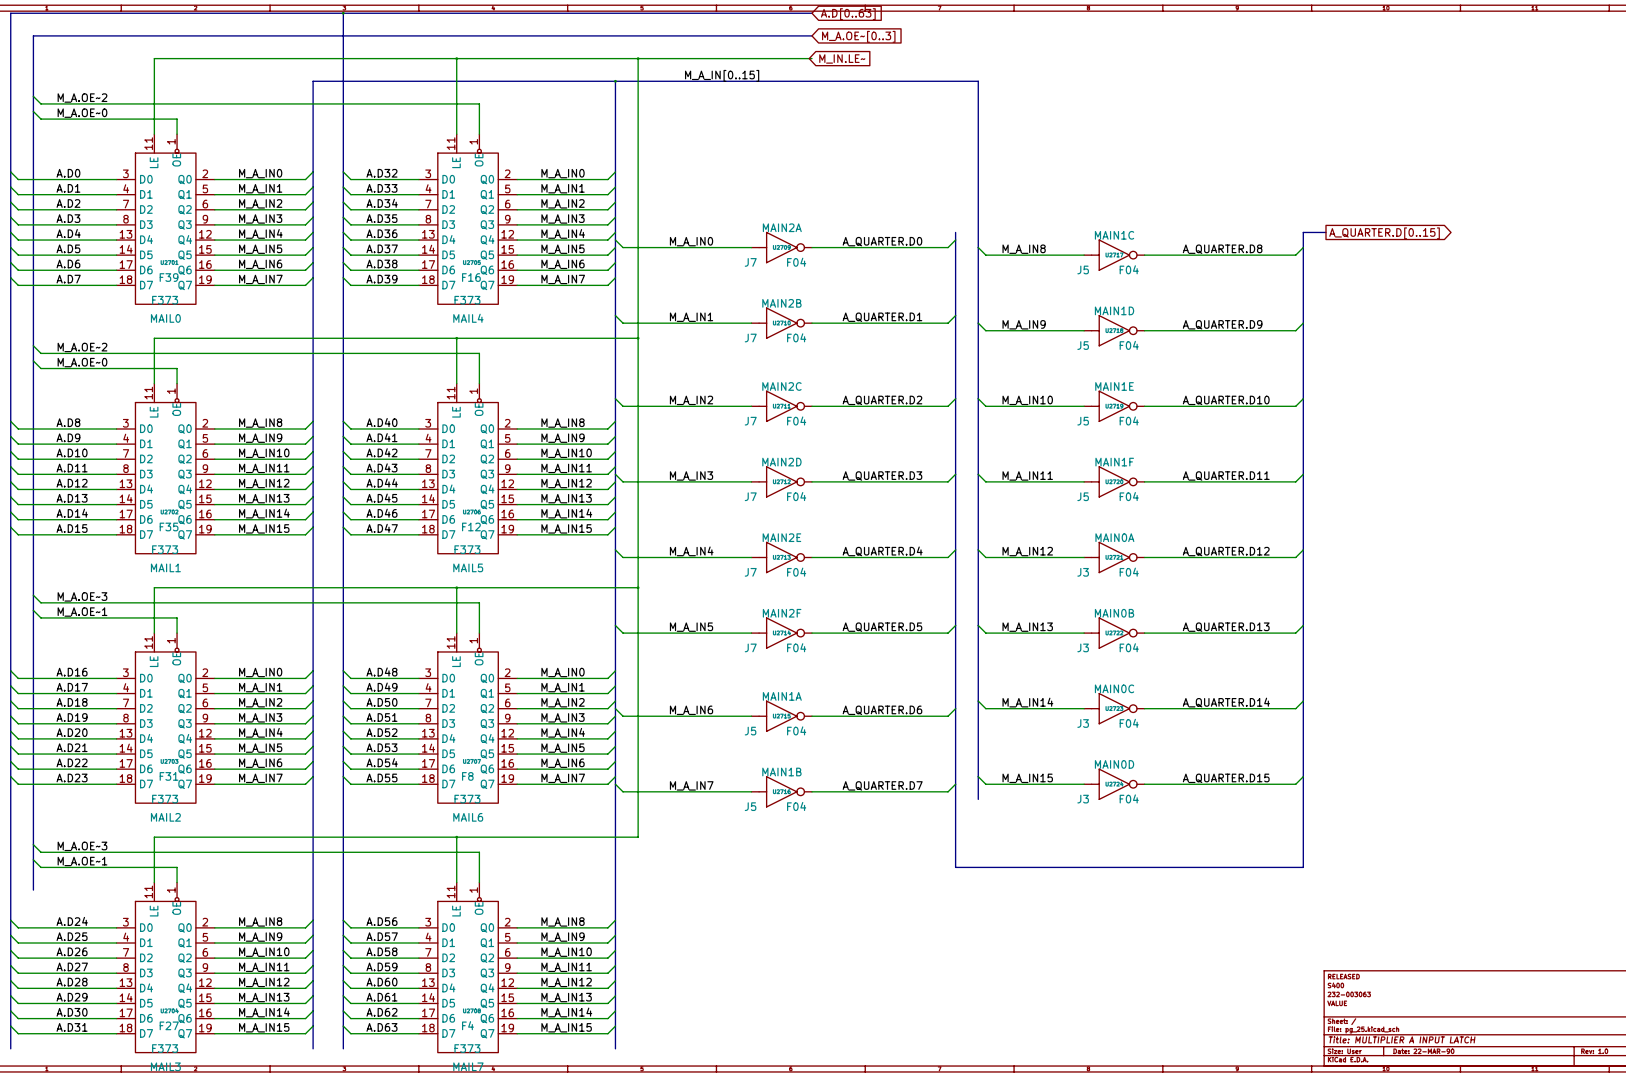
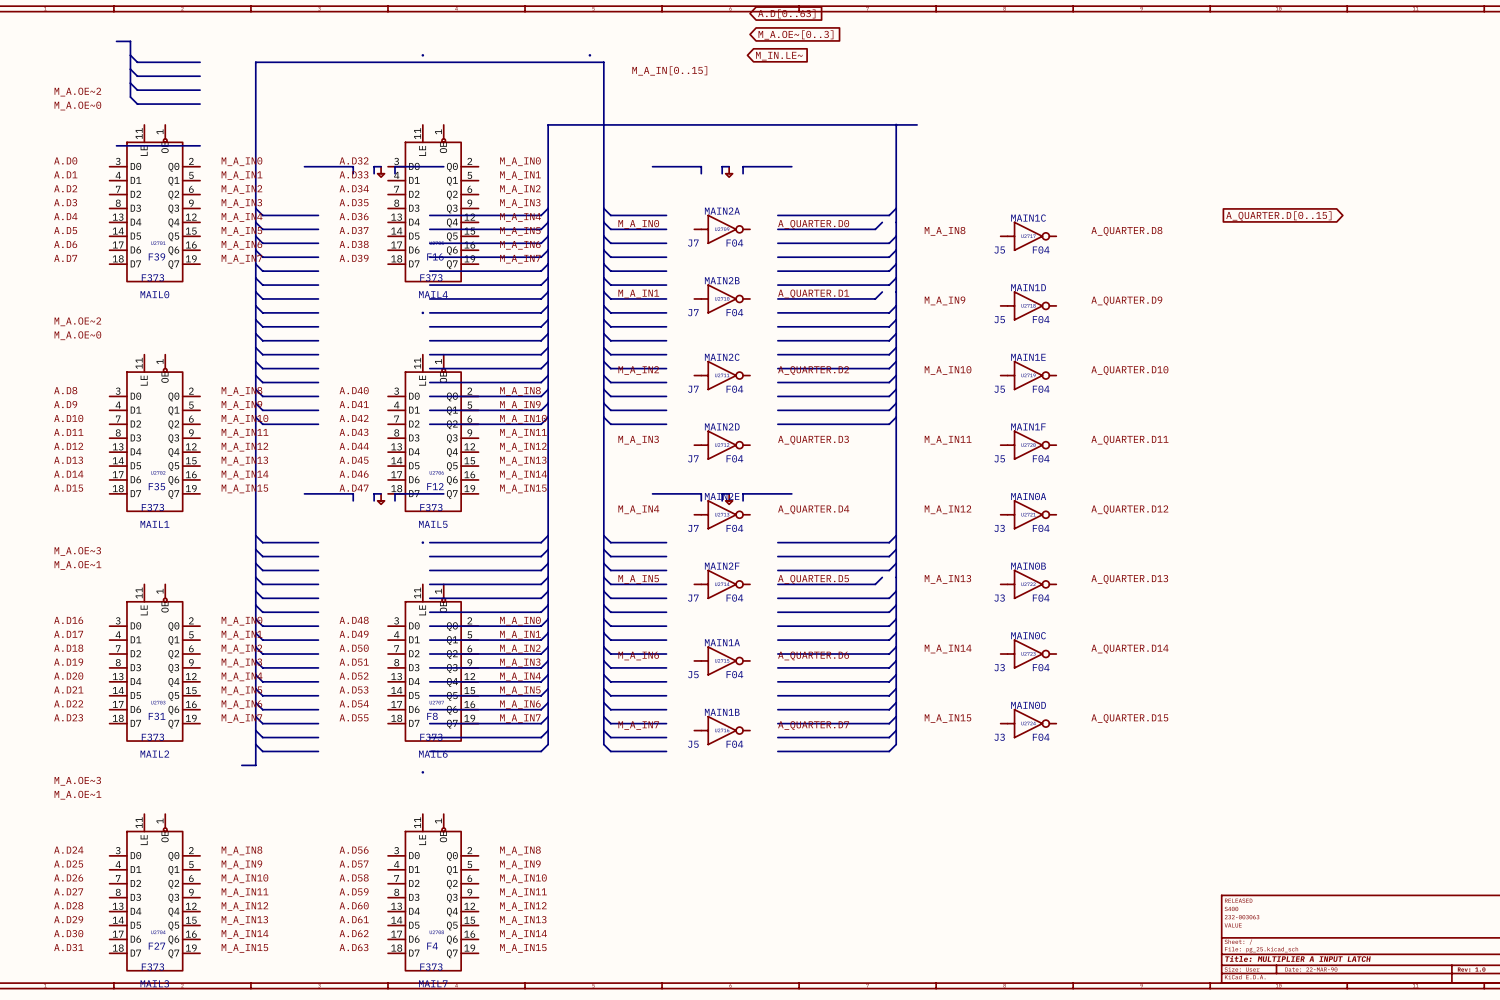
bus: (343, 13) (343, 1048) -> none
junction: (343, 13) -> none
bus: (811, 13) (10, 13) (10, 1048) -> none
bus: (811, 35) (33, 35) (33, 890) -> none
bus: none -> (116, 41) (130, 41) (130, 97)
wire: none -> (130, 55) (137, 62) (200, 62)
wire: (456, 58) (456, 134) -> none
wire: (638, 58) (638, 837) (154, 837) (154, 882) -> none
wire: (811, 58) (154, 58) (154, 134) -> none
wire: none -> (130, 69) (137, 76) (200, 76)
bus: (615, 81) (615, 1048) -> none
junction: (615, 81) -> none
wire: none -> (130, 83) (137, 90) (200, 90)
wire: (33, 96) (40, 103) (479, 103) (479, 134) -> none
wire: none -> (130, 97) (137, 104) (200, 104)
wire: (33, 111) (40, 119) (177, 119) (177, 134) -> none
bus: none -> (896, 124) (896, 744)
bus: none -> (917, 124) (548, 124) (548, 744)
wire: none -> (116, 145) (200, 145)
wire: (10, 171) (18, 179) (116, 179) -> none
wire: (313, 171) (305, 179) (214, 179) -> none
wire: (343, 171) (350, 179) -> (304, 166) (325, 166)
wire: (615, 171) (607, 179) (517, 179) -> none
wire: (381, 179) (403, 179) -> (353, 166) (353, 173)
wire: none -> (374, 166) (374, 173)
wire: (411, 179) (418, 179) -> none
wire: none -> (443, 166) (394, 166) (394, 173)
wire: none -> (652, 166) (701, 166) (701, 173)
wire: none -> (729, 166) (722, 166) (722, 173)
wire: none -> (791, 166) (743, 166) (743, 173)
power symbol: none -> (381, 172)
power symbol: none -> (729, 172)
wire: (10, 187) (18, 194) (116, 194) -> none
wire: (313, 187) (305, 194) (214, 194) -> none
wire: (343, 187) (350, 194) (418, 194) -> none
wire: (615, 187) (607, 194) (517, 194) -> none
wire: (10, 202) (18, 209) (116, 209) -> none
wire: (313, 202) (305, 209) (214, 209) -> none
wire: (343, 202) (350, 209) (418, 209) -> none
wire: (615, 202) (607, 209) (517, 209) -> none
wire: (10, 217) (18, 224) (116, 224) -> none
wire: (313, 217) (305, 224) (214, 224) -> none
wire: (343, 217) (350, 224) (418, 224) -> none
wire: (615, 217) (607, 224) (517, 224) -> none
wire: none -> (548, 208) (541, 215) (429, 215)
wire: none -> (603, 208) (610, 215) (666, 215)
wire: none -> (896, 208) (889, 215) (777, 215)
wire: (10, 232) (18, 240) (116, 240) -> none
wire: (313, 232) (305, 240) (214, 240) -> none
wire: (343, 232) (350, 240) (418, 240) -> (318, 215) (262, 215) (255, 208)
wire: (615, 232) (607, 240) (517, 240) -> none
bus: (955, 232) (955, 867) (1303, 867) (1303, 232) (1325, 232) -> none
wire: none -> (548, 222) (541, 229) (429, 229)
wire: (615, 240) (623, 247) (660, 247) -> (603, 222) (610, 229)
wire: (10, 247) (18, 255) (116, 255) -> none
wire: (313, 247) (305, 255) (214, 255) -> none
wire: (343, 247) (350, 255) (418, 255) -> (318, 229) (262, 229) (255, 222)
wire: (615, 247) (607, 255) (517, 255) -> none
wire: (721, 247) (751, 247) -> none
wire: (811, 247) (842, 247) -> none
wire: (978, 247) (985, 255) (1084, 255) -> none
wire: (1303, 247) (1295, 255) (1144, 255) -> none
wire: none -> (548, 236) (541, 243) (429, 243)
wire: none -> (603, 236) (610, 243) (666, 243)
wire: none -> (896, 236) (889, 243) (777, 243)
wire: (10, 262) (18, 270) (116, 270) -> none
wire: (313, 262) (305, 270) (214, 270) -> none
wire: (343, 262) (350, 270) (418, 270) -> (318, 243) (262, 243) (255, 236)
wire: (615, 262) (607, 270) (517, 270) -> none
wire: none -> (548, 250) (541, 257) (429, 257)
wire: none -> (603, 250) (610, 257) (666, 257)
wire: none -> (896, 250) (889, 257) (777, 257)
wire: (10, 277) (18, 285) (116, 285) -> none
wire: (313, 277) (305, 285) (214, 285) -> none
wire: (343, 277) (350, 285) (418, 285) -> (318, 257) (262, 257) (255, 250)
wire: (615, 277) (607, 285) (517, 285) -> none
wire: none -> (255, 264) (262, 271) (318, 271)
wire: none -> (548, 264) (541, 271) (429, 271)
wire: none -> (603, 264) (610, 271) (666, 271)
wire: none -> (896, 264) (889, 271) (777, 271)
wire: none -> (255, 278) (262, 285) (318, 285)
wire: none -> (548, 278) (541, 285) (429, 285)
wire: none -> (603, 278) (610, 285) (666, 285)
wire: none -> (896, 278) (889, 285) (777, 285)
wire: none -> (255, 292) (262, 298) (318, 298)
wire: none -> (548, 292) (541, 298) (429, 298)
wire: (615, 315) (623, 323) (660, 323) -> (603, 292) (610, 298)
wire: (721, 323) (751, 323) -> none
wire: (811, 323) (842, 323) -> none
wire: (978, 323) (985, 330) (1084, 330) -> none
wire: (1303, 323) (1295, 330) (1144, 330) -> none
wire: none -> (603, 305) (610, 312) (666, 312)
wire: none -> (896, 305) (889, 312) (777, 312)
wire: (282, 338) (154, 338) (154, 383) -> (262, 312) (255, 305)
wire: (343, 338) (464, 338) -> none
wire: (456, 338) (456, 383) -> none
wire: (585, 338) (638, 338) -> (541, 312) (548, 305)
wire: (33, 345) (40, 353) (282, 353) -> (255, 319) (262, 326)
wire: none -> (603, 319) (610, 326) (666, 326)
wire: none -> (896, 319) (889, 326) (777, 326)
wire: (343, 353) (464, 353) -> none
wire: (479, 353) (479, 383) -> (443, 326) (541, 326) (548, 319)
wire: (33, 360) (40, 368) (177, 368) (177, 383) -> none
wire: none -> (255, 333) (262, 340) (318, 340)
wire: none -> (548, 333) (541, 340) (429, 340)
wire: none -> (603, 333) (610, 340) (666, 340)
wire: none -> (896, 333) (889, 340) (777, 340)
wire: none -> (255, 347) (262, 354) (318, 354)
wire: none -> (548, 347) (541, 354) (429, 354)
wire: none -> (603, 347) (610, 354) (666, 354)
wire: none -> (896, 347) (889, 354) (777, 354)
wire: none -> (255, 361) (262, 368) (318, 368)
wire: none -> (548, 361) (541, 368) (429, 368)
wire: none -> (603, 361) (610, 368) (666, 368)
wire: none -> (896, 361) (889, 368) (777, 368)
wire: (615, 398) (623, 406) (751, 406) -> none
wire: (955, 398) (948, 406) (811, 406) -> none
wire: (978, 398) (985, 406) (1084, 406) -> none
wire: (1303, 398) (1295, 406) (1144, 406) -> none
wire: none -> (255, 375) (262, 382) (318, 382)
wire: none -> (548, 375) (541, 382) (429, 382)
wire: none -> (603, 375) (610, 382) (666, 382)
wire: none -> (896, 375) (889, 382) (777, 382)
wire: (10, 421) (18, 428) (116, 428) -> none
wire: (313, 421) (305, 428) -> (318, 396) (283, 396)
wire: (343, 421) (350, 428) (418, 428) -> none
wire: (615, 421) (607, 428) (585, 428) -> (548, 389) (541, 396)
wire: none -> (603, 389) (610, 396) (666, 396)
wire: none -> (896, 389) (889, 396) (777, 396)
wire: (214, 428) (282, 428) -> (255, 389) (262, 396)
wire: none -> (429, 396) (478, 396)
wire: (10, 436) (18, 444) (116, 444) -> none
wire: (313, 436) (305, 444) -> (318, 410) (283, 410)
wire: (343, 436) (350, 444) (418, 444) -> none
wire: (615, 436) (607, 444) (585, 444) -> (548, 403) (541, 410)
wire: none -> (603, 403) (610, 410) (666, 410)
wire: none -> (896, 403) (889, 410) (777, 410)
wire: (214, 444) (282, 444) -> (255, 403) (262, 410)
wire: none -> (429, 410) (478, 410)
wire: (10, 451) (18, 459) (116, 459) -> none
wire: (313, 451) (305, 459) -> (318, 424) (283, 424)
wire: (343, 451) (350, 459) (418, 459) -> none
wire: (615, 451) (607, 459) (585, 459) -> (548, 417) (541, 424)
wire: none -> (603, 417) (610, 424) (666, 424)
wire: none -> (896, 417) (889, 424) (777, 424)
wire: (214, 459) (282, 459) -> (255, 417) (262, 424)
wire: none -> (429, 424) (478, 424)
wire: (10, 466) (18, 474) (116, 474) -> none
wire: (313, 466) (305, 474) (214, 474) -> none
wire: (343, 466) (350, 474) (418, 474) -> none
wire: (615, 466) (607, 474) (517, 474) -> none
wire: (615, 474) (623, 481) (751, 481) -> none
wire: (955, 474) (948, 481) (811, 481) -> none
wire: (978, 474) (985, 481) (1084, 481) -> none
wire: (1303, 474) (1295, 481) (1144, 481) -> none
wire: (10, 481) (18, 489) (116, 489) -> none
wire: (313, 481) (305, 489) (214, 489) -> none
wire: (343, 481) (350, 489) (418, 489) -> none
wire: (615, 481) (607, 489) (517, 489) -> none
wire: (10, 497) (18, 504) (116, 504) -> none
wire: (313, 497) (305, 504) (214, 504) -> none
wire: (343, 497) (350, 504) (418, 504) -> none
wire: (615, 497) (607, 504) (517, 504) -> none
wire: (10, 512) (18, 519) (116, 519) -> none
wire: (313, 512) (305, 519) (214, 519) -> none
wire: (343, 512) (350, 519) (418, 519) -> none
wire: (615, 512) (607, 519) (517, 519) -> none
wire: (10, 527) (18, 534) (116, 534) -> none
wire: (313, 527) (305, 534) (214, 534) -> none
wire: (343, 527) (350, 534) -> (304, 493) (325, 493)
wire: (615, 527) (607, 534) (517, 534) -> none
wire: (381, 534) (403, 534) -> (353, 493) (353, 500)
wire: none -> (374, 493) (374, 500)
wire: (411, 534) (418, 534) -> none
wire: none -> (443, 493) (394, 493) (394, 500)
wire: none -> (652, 493) (701, 493) (701, 500)
wire: none -> (729, 493) (722, 493) (722, 500)
wire: none -> (791, 493) (743, 493) (743, 500)
power symbol: none -> (381, 499)
power symbol: none -> (729, 499)
wire: (615, 549) (623, 557) (751, 557) -> none
wire: (955, 549) (948, 557) (811, 557) -> none
wire: (978, 549) (985, 557) (1084, 557) -> none
wire: (1303, 549) (1295, 557) (1144, 557) -> none
wire: none -> (603, 535) (610, 542) (666, 542)
wire: none -> (896, 535) (889, 542) (777, 542)
wire: (282, 587) (154, 587) (154, 633) -> (262, 542) (255, 535)
wire: (343, 587) (464, 587) -> none
wire: (456, 587) (456, 633) -> none
wire: (585, 587) (638, 587) -> (541, 542) (548, 535)
wire: (33, 595) (40, 602) (282, 602) -> (255, 549) (262, 556)
wire: none -> (603, 549) (610, 556) (666, 556)
wire: none -> (896, 549) (889, 556) (777, 556)
wire: (343, 602) (464, 602) -> none
wire: (479, 602) (479, 633) -> (443, 556) (541, 556) (548, 549)
wire: (33, 610) (40, 617) (177, 617) (177, 633) -> none
wire: none -> (255, 563) (262, 570) (318, 570)
wire: none -> (548, 563) (541, 570) (429, 570)
wire: none -> (603, 563) (610, 570) (666, 570)
wire: none -> (896, 563) (889, 570) (777, 570)
wire: none -> (255, 577) (262, 584) (318, 584)
wire: none -> (548, 577) (541, 584) (429, 584)
wire: (615, 625) (623, 633) (660, 633) -> (603, 577) (610, 584)
wire: (978, 625) (985, 633) (1084, 633) -> none
wire: (1303, 625) (1295, 633) (1144, 633) -> none
wire: (721, 633) (751, 633) -> none
wire: (811, 633) (842, 633) -> none
wire: none -> (255, 591) (262, 598) (318, 598)
wire: none -> (548, 591) (541, 598) (429, 598)
wire: none -> (603, 591) (610, 598) (666, 598)
wire: none -> (896, 591) (889, 598) (777, 598)
wire: none -> (255, 605) (262, 612) (318, 612)
wire: none -> (548, 605) (541, 612) (429, 612)
wire: none -> (603, 605) (610, 612) (666, 612)
wire: none -> (896, 605) (889, 612) (777, 612)
wire: (10, 670) (18, 678) (116, 678) -> none
wire: (313, 670) (305, 678) -> (318, 626) (283, 626)
wire: (343, 670) (350, 678) (418, 678) -> none
wire: (615, 670) (607, 678) (585, 678) -> (548, 619) (541, 626)
wire: none -> (603, 619) (610, 626) (666, 626)
wire: none -> (896, 619) (889, 626) (777, 626)
wire: (214, 678) (282, 678) -> (255, 619) (262, 626)
wire: none -> (429, 626) (478, 626)
wire: (10, 685) (18, 693) (116, 693) -> none
wire: (313, 685) (305, 693) -> (318, 640) (283, 640)
wire: (343, 685) (350, 693) (418, 693) -> none
wire: (615, 685) (607, 693) (585, 693) -> (548, 633) (541, 640)
wire: none -> (603, 633) (610, 640) (666, 640)
wire: none -> (896, 633) (889, 640) (777, 640)
wire: (214, 693) (282, 693) -> (255, 633) (262, 640)
wire: none -> (429, 640) (478, 640)
wire: (10, 701) (18, 708) (116, 708) -> none
wire: (313, 701) (305, 708) -> (318, 654) (283, 654)
wire: (343, 701) (350, 708) (418, 708) -> none
wire: (615, 701) (607, 708) (585, 708) -> (548, 647) (541, 654)
wire: none -> (603, 647) (610, 654) (666, 654)
wire: none -> (896, 647) (889, 654) (777, 654)
wire: (978, 701) (985, 708) (1084, 708) -> none
wire: (1303, 701) (1295, 708) (1144, 708) -> none
wire: (214, 708) (282, 708) -> (255, 647) (262, 654)
wire: none -> (429, 654) (478, 654)
wire: (615, 708) (623, 716) (751, 716) -> none
wire: (955, 708) (948, 716) (811, 716) -> none
wire: (10, 716) (18, 723) (116, 723) -> none
wire: (313, 716) (305, 723) -> (318, 667) (283, 667)
wire: (343, 716) (350, 723) (418, 723) -> none
wire: (615, 716) (607, 723) (585, 723) -> (548, 660) (541, 667)
wire: none -> (603, 660) (610, 667) (666, 667)
wire: none -> (896, 660) (889, 667) (777, 667)
wire: (214, 723) (282, 723) -> (255, 660) (262, 667)
wire: none -> (429, 667) (478, 667)
wire: (10, 731) (18, 738) (116, 738) -> none
wire: (313, 731) (305, 738) -> (318, 681) (283, 681)
wire: (343, 731) (350, 738) (418, 738) -> none
wire: (615, 731) (607, 738) (585, 738) -> (548, 674) (541, 681)
wire: none -> (603, 674) (610, 681) (666, 681)
wire: none -> (896, 674) (889, 681) (777, 681)
wire: (214, 738) (282, 738) -> (255, 674) (262, 681)
wire: none -> (429, 681) (478, 681)
wire: (10, 746) (18, 754) (116, 754) -> none
wire: (313, 746) (305, 754) -> (318, 695) (283, 695)
wire: (343, 746) (350, 754) (418, 754) -> none
wire: (615, 746) (607, 754) (585, 754) -> (548, 688) (541, 695)
wire: none -> (603, 688) (610, 695) (666, 695)
wire: none -> (896, 688) (889, 695) (777, 695)
wire: (214, 754) (282, 754) -> (255, 688) (262, 695)
wire: none -> (429, 695) (478, 695)
wire: (10, 761) (18, 769) (116, 769) -> none
wire: (313, 761) (305, 769) -> (318, 709) (283, 709)
wire: (343, 761) (350, 769) (418, 769) -> none
wire: (615, 761) (607, 769) (585, 769) -> (548, 702) (541, 709)
wire: none -> (603, 702) (610, 709) (666, 709)
wire: none -> (896, 702) (889, 709) (777, 709)
wire: (214, 769) (282, 769) -> (255, 702) (262, 709)
wire: none -> (429, 709) (478, 709)
wire: (10, 776) (18, 784) (116, 784) -> none
wire: (313, 776) (305, 784) -> (318, 723) (283, 723)
wire: (343, 776) (350, 784) (418, 784) -> none
wire: (615, 776) (607, 784) (585, 784) -> (548, 716) (541, 723)
wire: none -> (603, 716) (610, 723) (666, 723)
wire: none -> (896, 716) (889, 723) (777, 723)
wire: (978, 776) (985, 784) (1084, 784) -> none
wire: (1303, 776) (1295, 784) (1144, 784) -> none
wire: (214, 784) (282, 784) -> (255, 716) (262, 723)
wire: none -> (429, 723) (478, 723)
wire: (615, 784) (623, 791) (751, 791) -> none
wire: (955, 784) (948, 791) (811, 791) -> none
wire: none -> (255, 730) (262, 737) (318, 737)
wire: none -> (548, 730) (541, 737) (429, 737)
wire: none -> (603, 730) (610, 737) (666, 737)
wire: none -> (896, 730) (889, 737) (777, 737)
bus: (978, 799) (978, 81) (313, 81) (313, 1048) -> none
wire: none -> (255, 744) (262, 751) (318, 751)
wire: none -> (548, 744) (541, 751) (429, 751)
bus: none -> (603, 744) (603, 62) (255, 62) (255, 765) (241, 765)
wire: none -> (603, 744) (610, 751) (666, 751)
wire: none -> (896, 744) (889, 751) (777, 751)
wire: (456, 837) (456, 882) -> none
wire: (33, 844) (40, 852) (479, 852) (479, 882) -> none
wire: (33, 859) (40, 867) (177, 867) (177, 882) -> none
wire: (10, 920) (18, 927) (116, 927) -> none
wire: (313, 920) (305, 927) (214, 927) -> none
wire: (343, 920) (350, 927) (418, 927) -> none
wire: (615, 920) (607, 927) (517, 927) -> none
wire: (10, 935) (18, 943) (116, 943) -> none
wire: (313, 935) (305, 943) (214, 943) -> none
wire: (343, 935) (350, 943) (418, 943) -> none
wire: (615, 935) (607, 943) (517, 943) -> none
wire: (10, 950) (18, 958) (116, 958) -> none
wire: (313, 950) (305, 958) (214, 958) -> none
wire: (343, 950) (350, 958) (418, 958) -> none
wire: (615, 950) (607, 958) (517, 958) -> none
wire: (10, 965) (18, 973) (116, 973) -> none
wire: (313, 965) (305, 973) (214, 973) -> none
wire: (343, 965) (350, 973) (418, 973) -> none
wire: (615, 965) (607, 973) (517, 973) -> none
wire: (10, 980) (18, 988) (116, 988) -> none
wire: (313, 980) (305, 988) (214, 988) -> none
wire: (343, 980) (350, 988) (418, 988) -> none
wire: (615, 980) (607, 988) (517, 988) -> none
wire: (10, 995) (18, 1003) (116, 1003) -> none
wire: (313, 995) (305, 1003) (214, 1003) -> none
wire: (343, 995) (350, 1003) (418, 1003) -> none
wire: (615, 995) (607, 1003) (517, 1003) -> none
wire: (10, 1011) (18, 1018) (116, 1018) -> none
wire: (313, 1011) (305, 1018) (214, 1018) -> none
wire: (343, 1011) (350, 1018) (418, 1018) -> none
wire: (615, 1011) (607, 1018) (517, 1018) -> none
wire: (10, 1026) (18, 1033) (116, 1033) -> none
wire: (313, 1026) (305, 1033) (214, 1033) -> none
wire: (343, 1026) (350, 1033) (418, 1033) -> none
wire: (615, 1026) (607, 1033) (517, 1033) -> none

